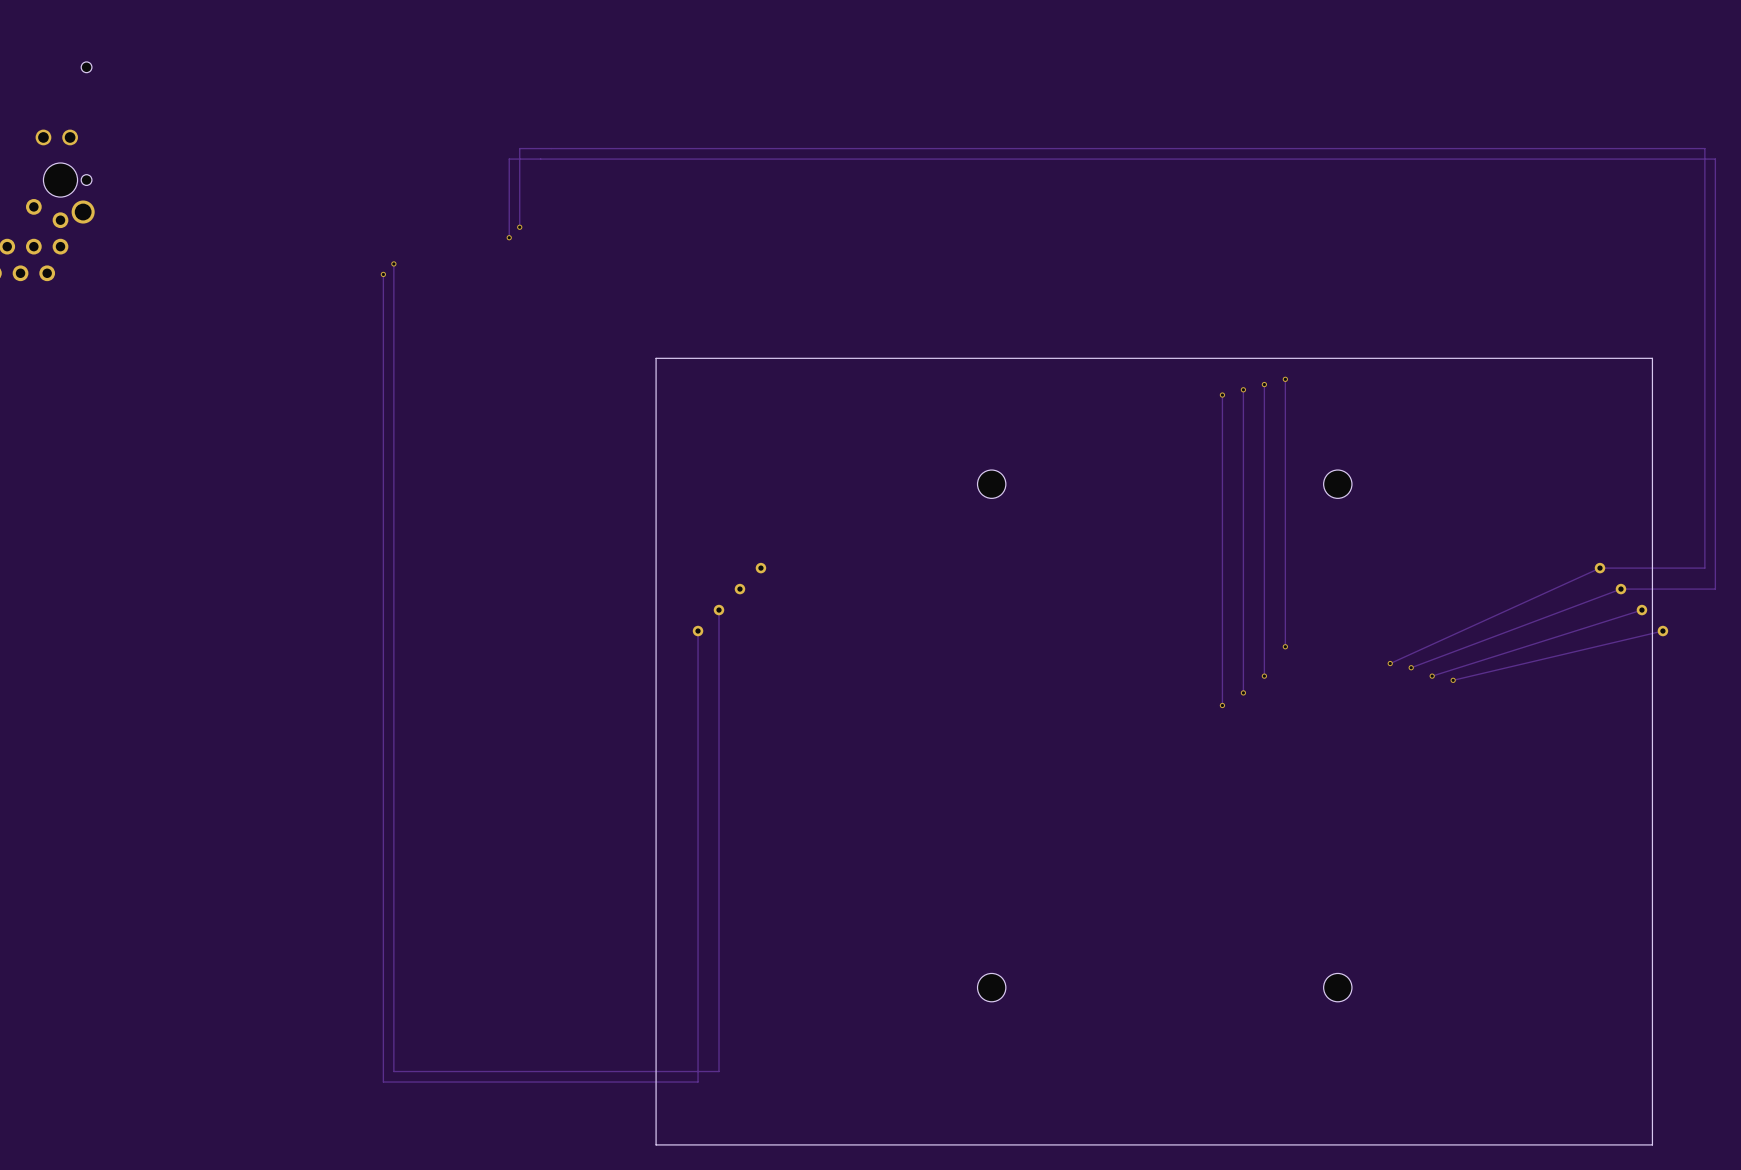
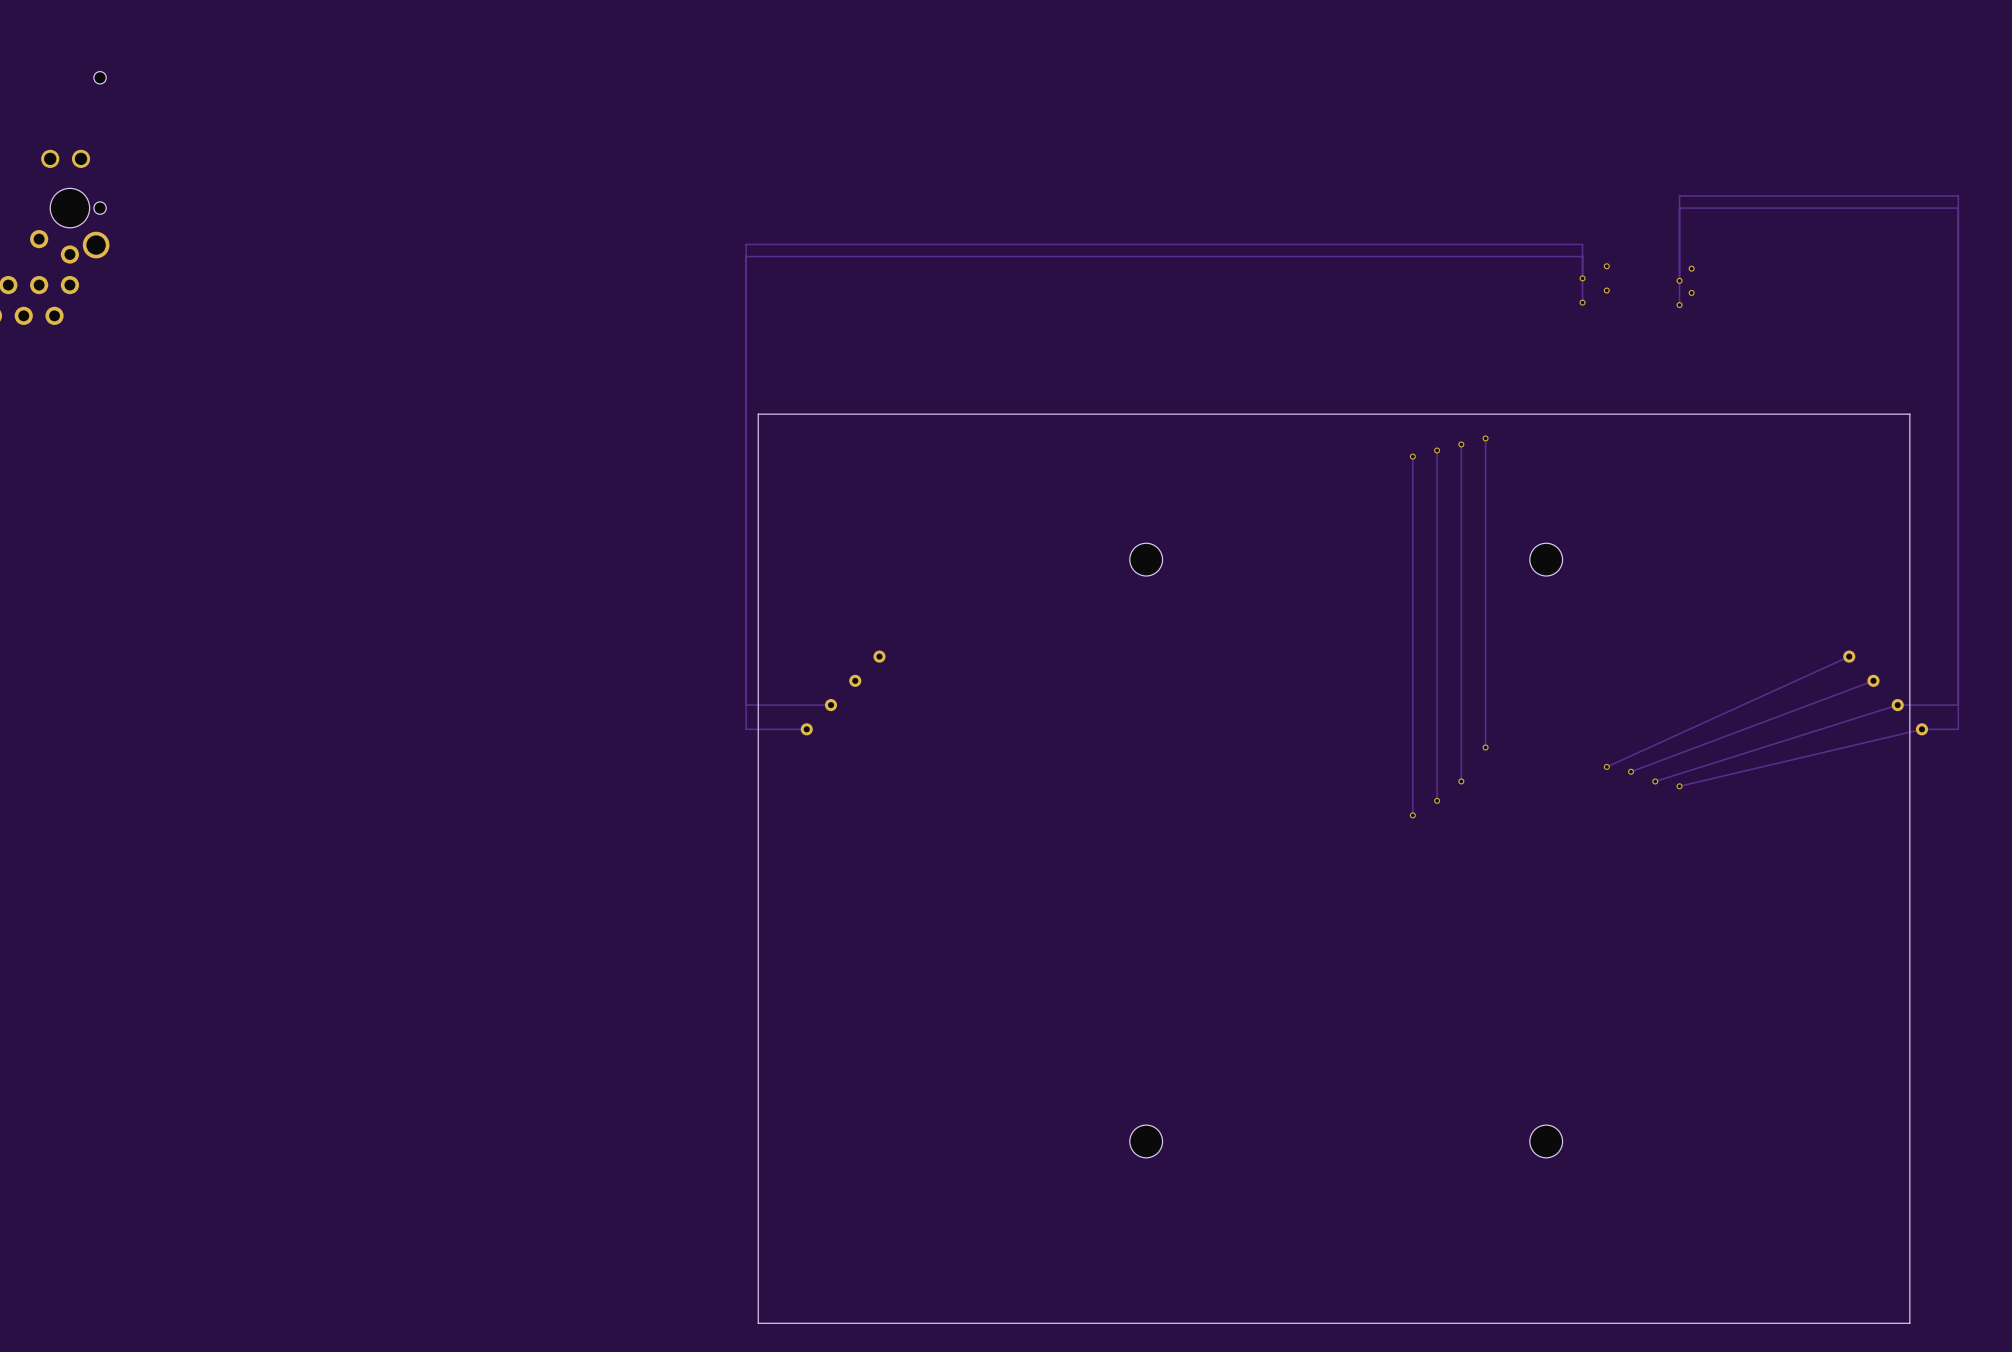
track: none -> (1958, 208) (1679, 208)
track: none -> (1582, 256) (746, 256)
track: (519, 227) (519, 148) (1704, 148) (1704, 568) (1599, 568) -> none
via: (519, 227) -> none
via: none -> (1606, 266)
via: none -> (1691, 268)
track: (509, 237) (509, 159) (1715, 159) (1715, 589) (1620, 589) -> none
via: (509, 237) -> none
via: none -> (1582, 278)
via: none -> (1679, 280)
via: none -> (1606, 290)
via: none -> (1691, 292)
via: none -> (1582, 302)
track: (393, 263) (393, 1071) (719, 1071) (719, 610) -> (746, 705) (831, 705)
via: (393, 263) -> none
track: none -> (1679, 305) (1679, 195) (1958, 195) (1958, 729) (1921, 729)
via: none -> (1679, 305)
track: (383, 274) (383, 1082) (698, 1082) (698, 631) -> (1582, 302) (1582, 244) (746, 244) (746, 729) (806, 729)
via: (383, 274) -> none
track: none -> (1958, 705) (1897, 705)

